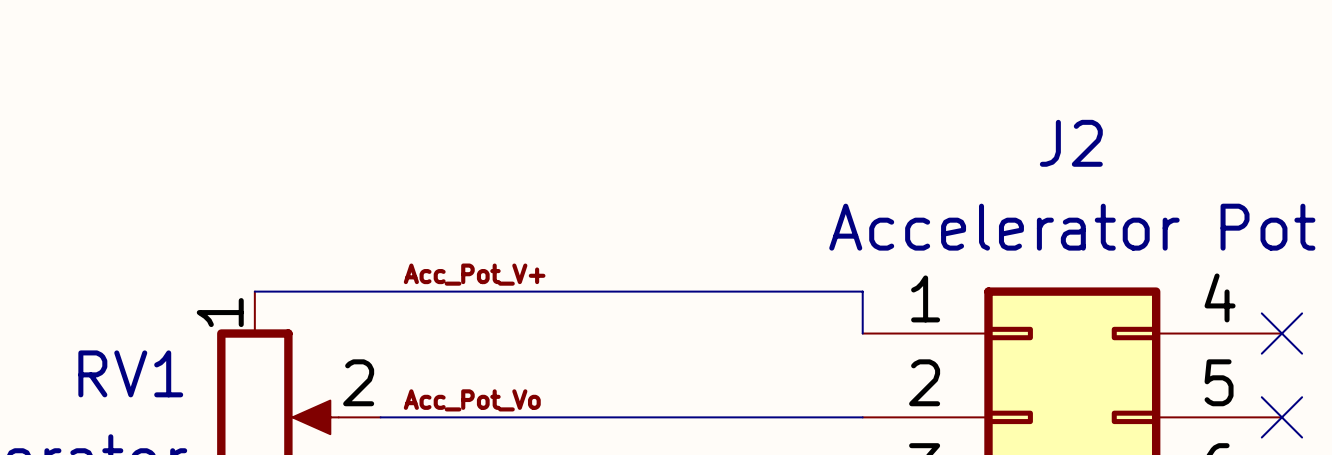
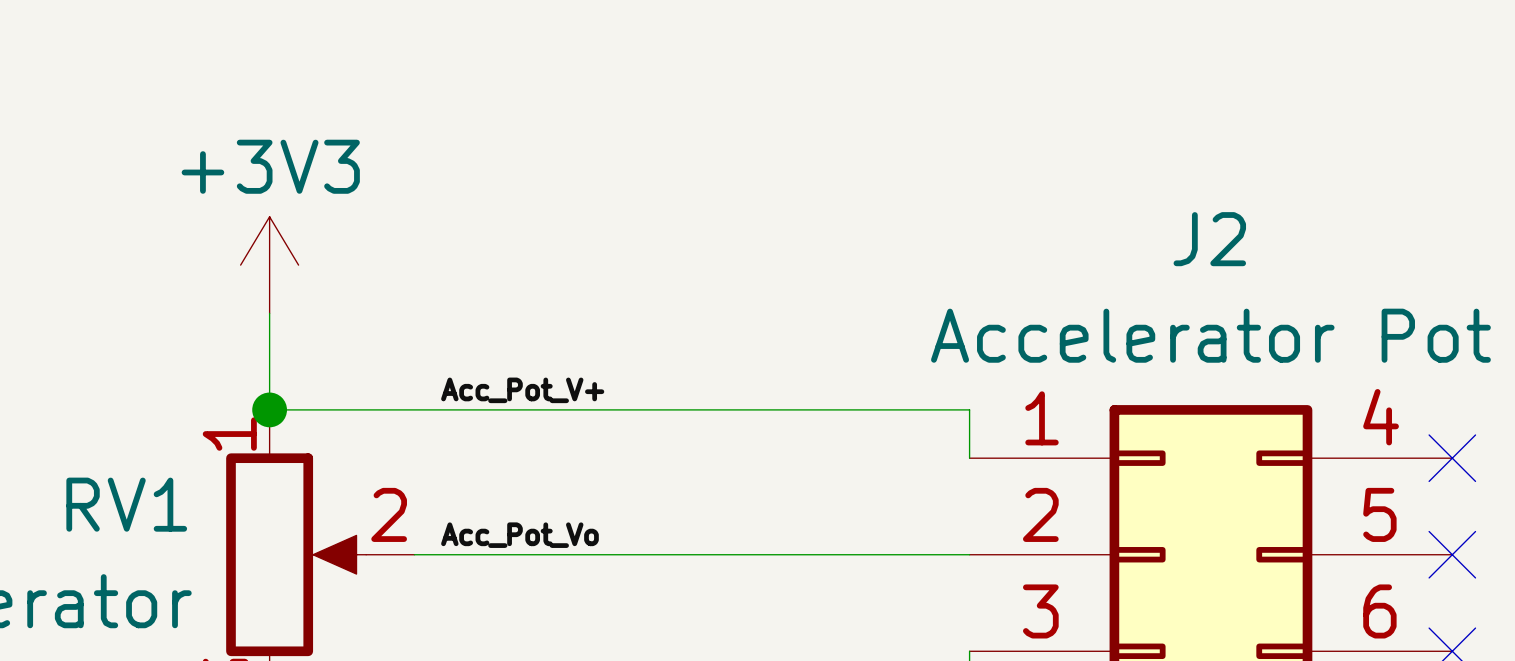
power symbol: none -> +3V3 (269, 265)
wire: none -> (269, 313) (269, 409)
junction: none -> (269, 409)

